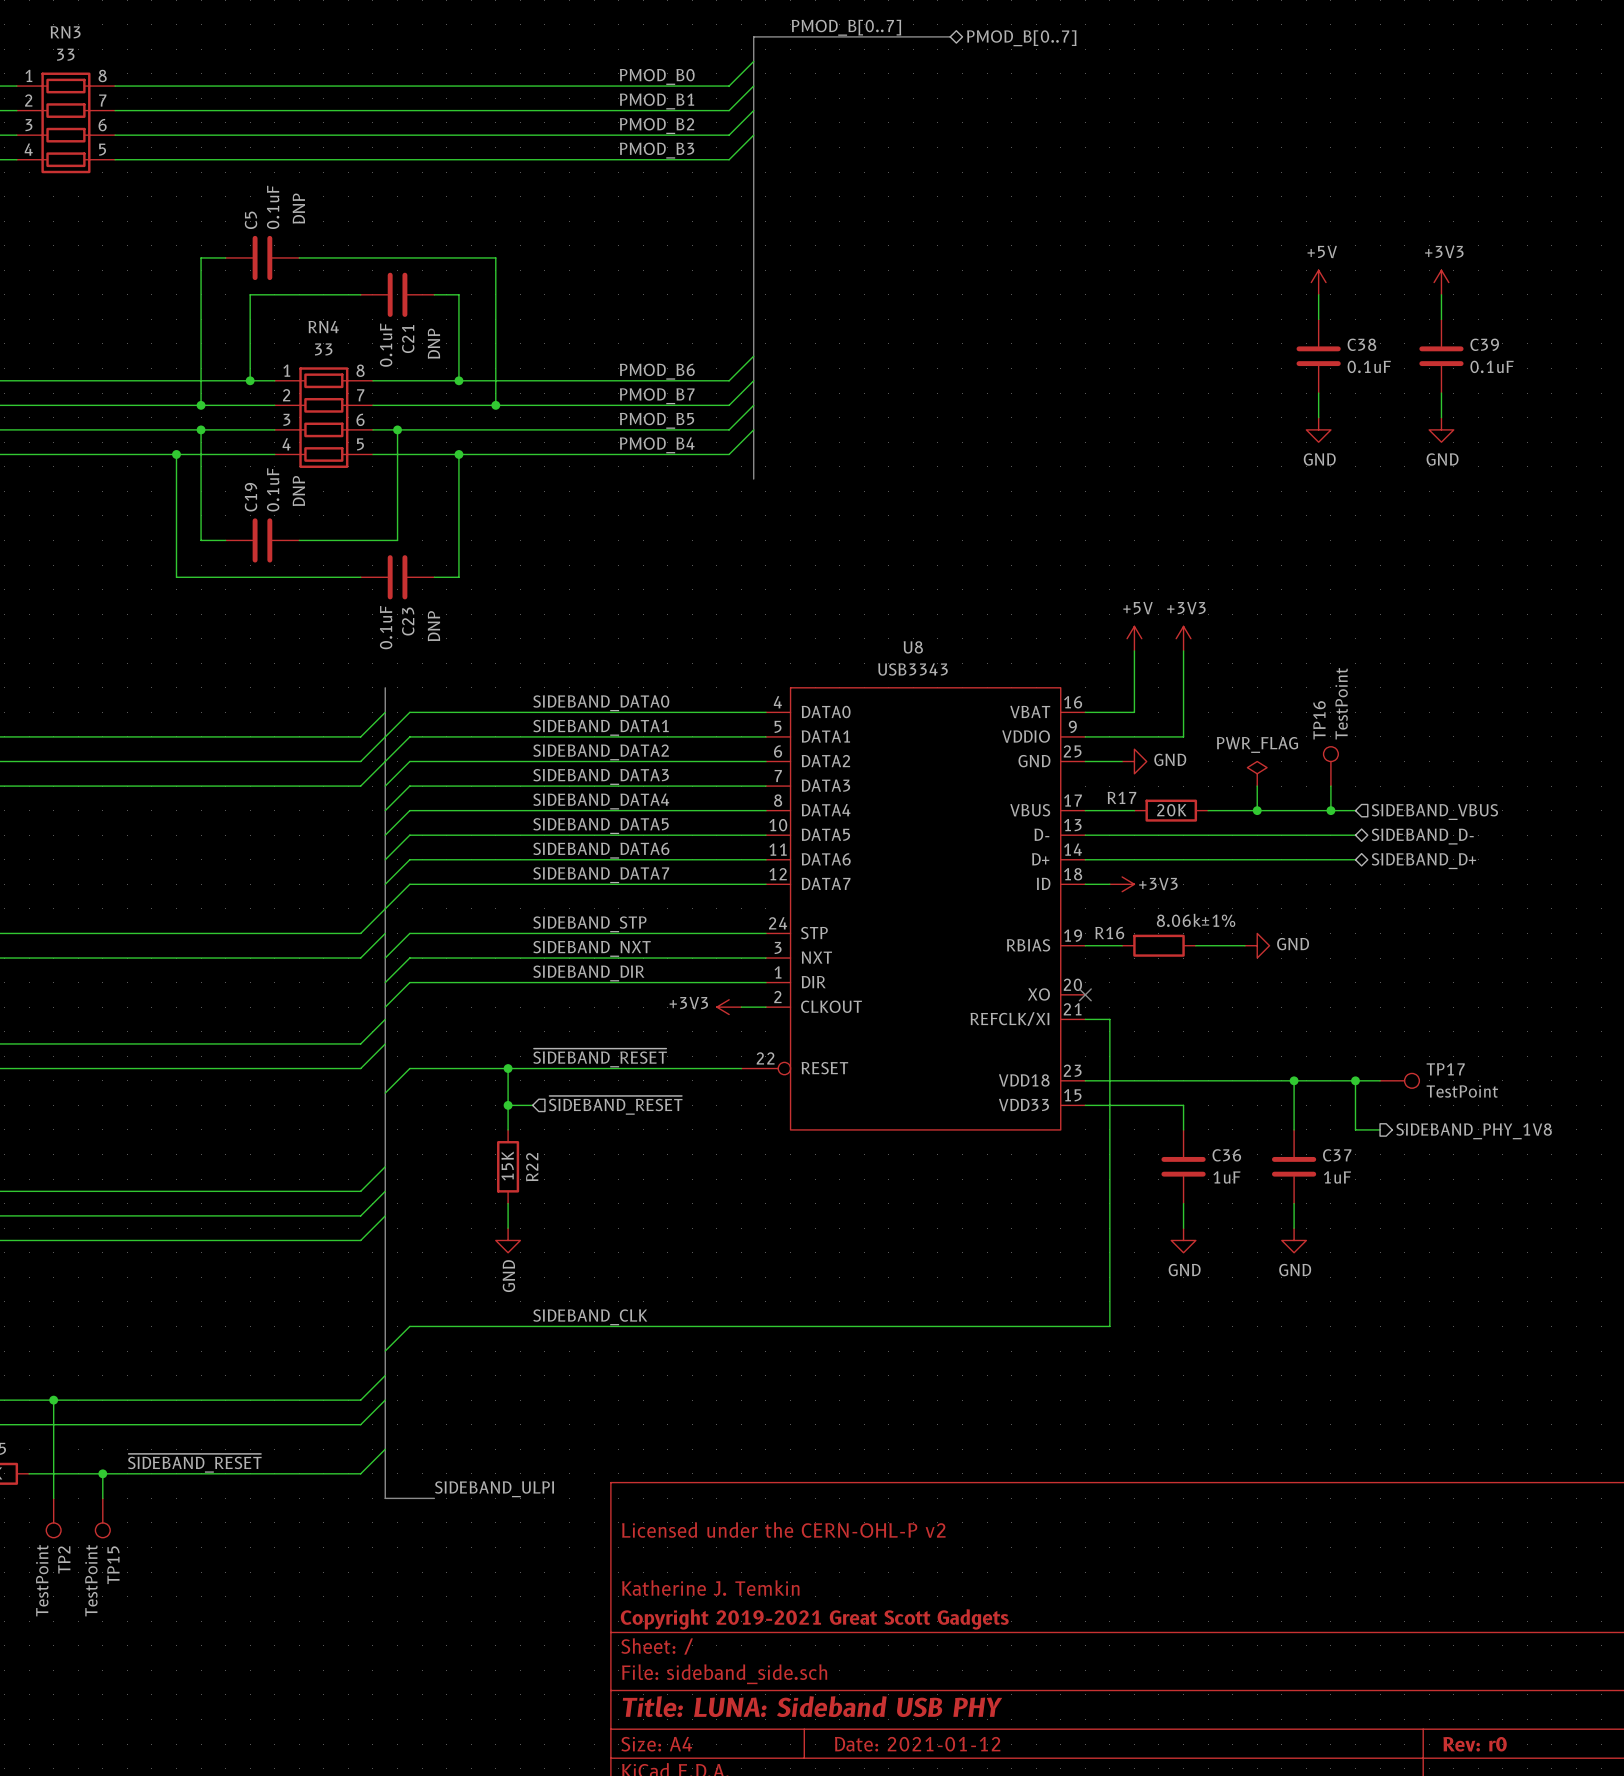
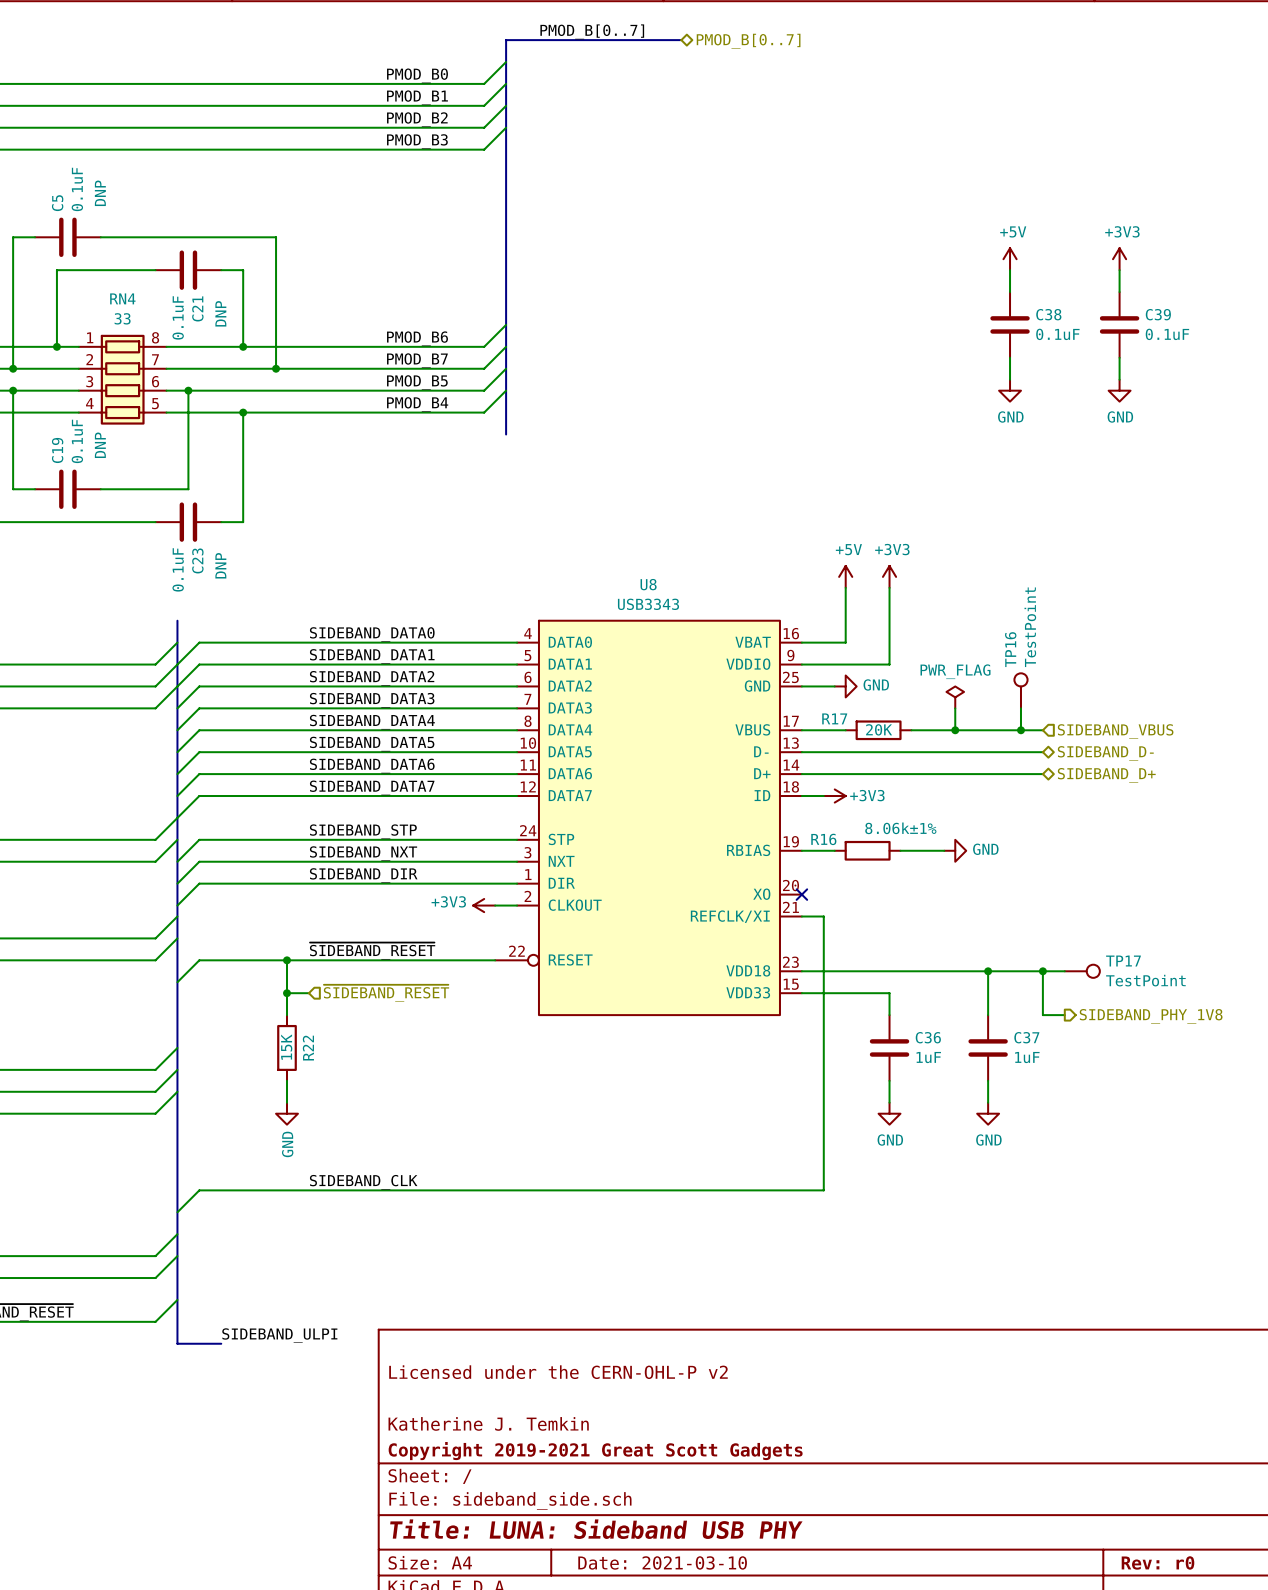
title block: Date: 2021-01-12 (917, 1744) -> Date: 2021-03-10 (662, 1562)

